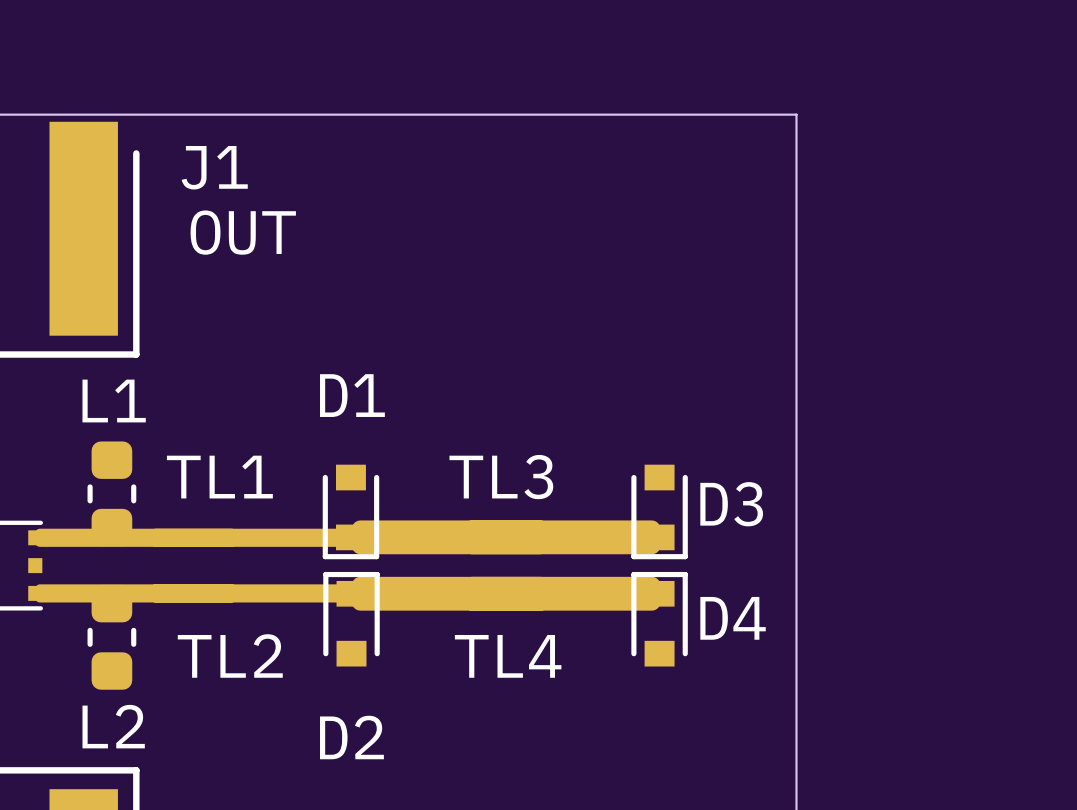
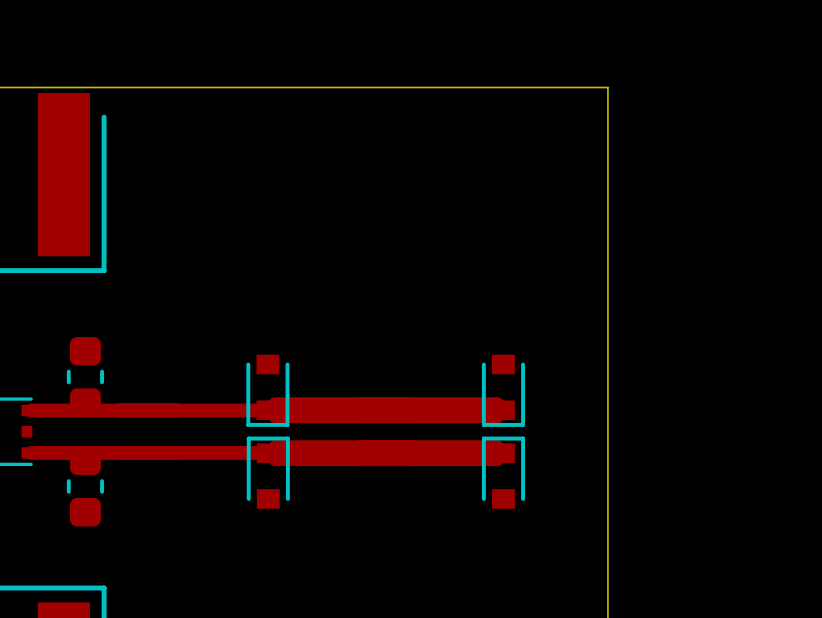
J1 name: J1 (214, 167) -> none
text: OUT (243, 232) -> none
D1 name: D1 (352, 395) -> none
L1 name: L1 (114, 401) -> none
TL1 name: TL1 (219, 477) -> none
TL3 name: TL3 (501, 477) -> none
D3 name: D3 (731, 504) -> none
D4 name: D4 (733, 618) -> none
TL2 name: TL2 (230, 656) -> none
TL4 name: TL4 (508, 656) -> none
L2 name: L2 (113, 726) -> none
D2 name: D2 (351, 737) -> none

